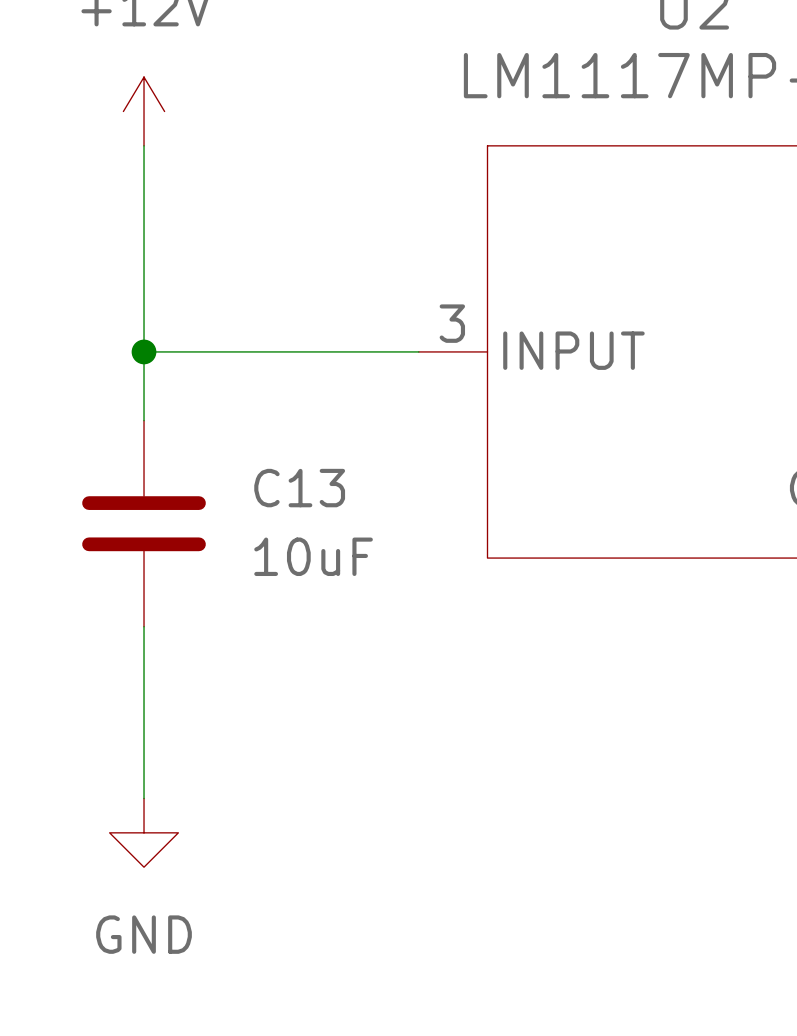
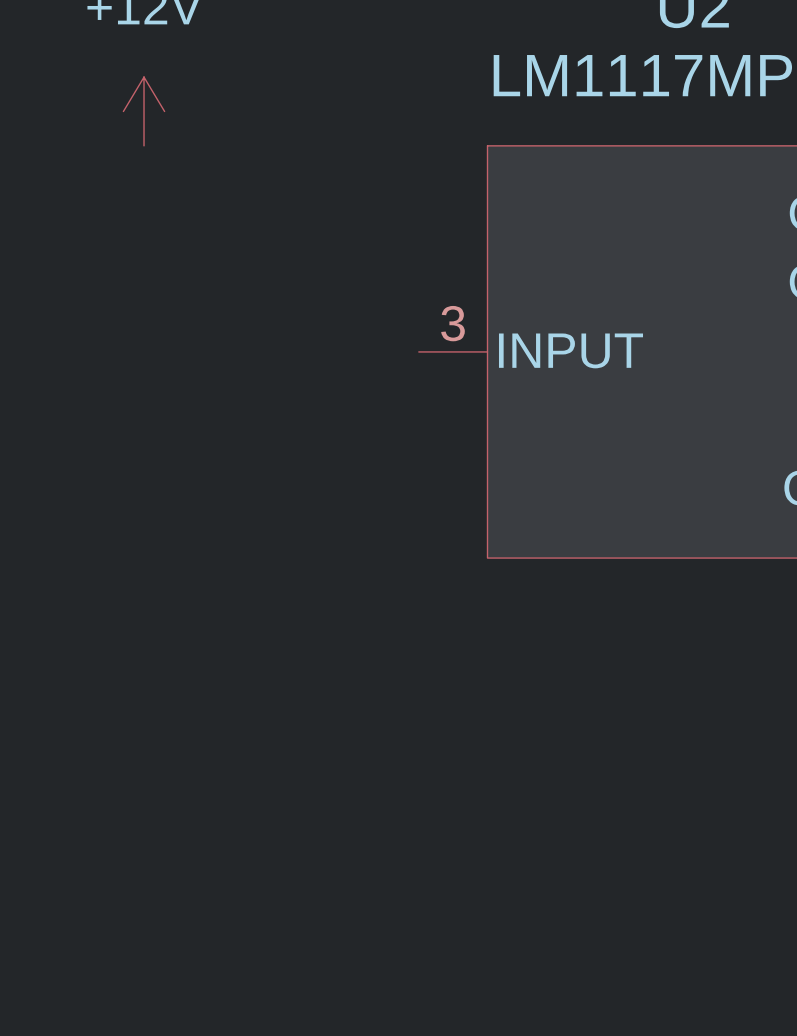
wire: (144, 145) (144, 420) -> none
wire: (144, 351) (418, 351) -> none
junction: (144, 351) -> none
C13: 10uF (144, 523) -> none
wire: (144, 626) (144, 798) -> none
power symbol: GND (144, 832) -> none

